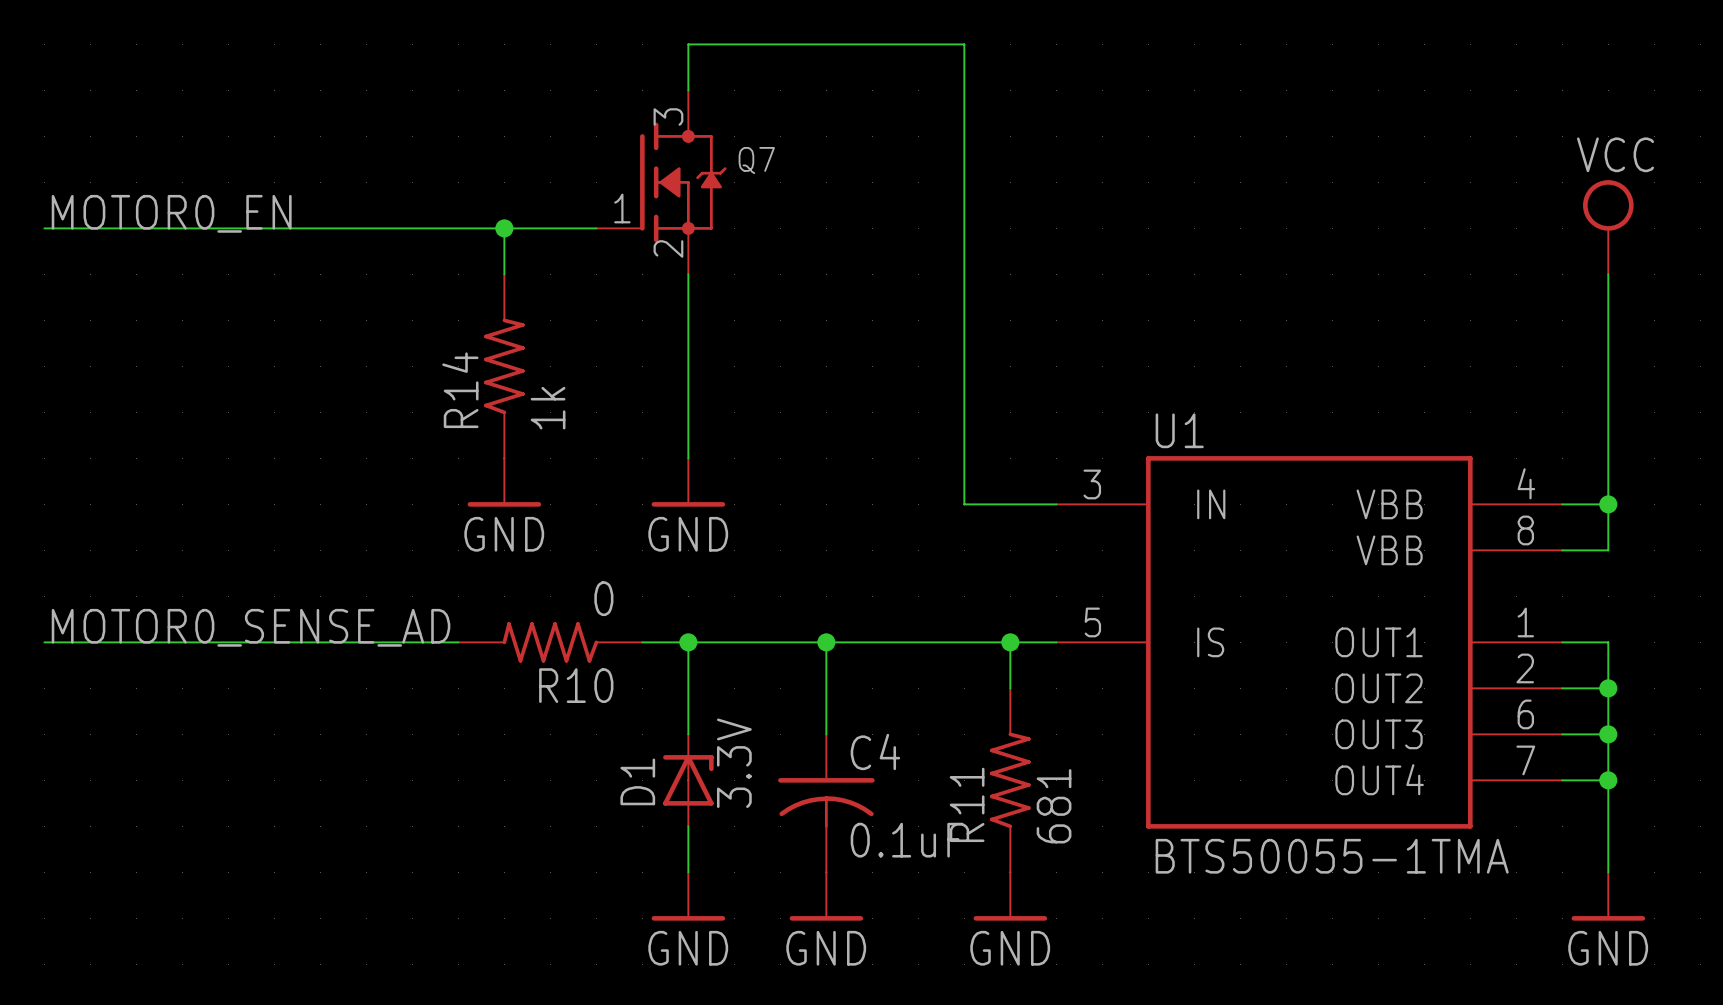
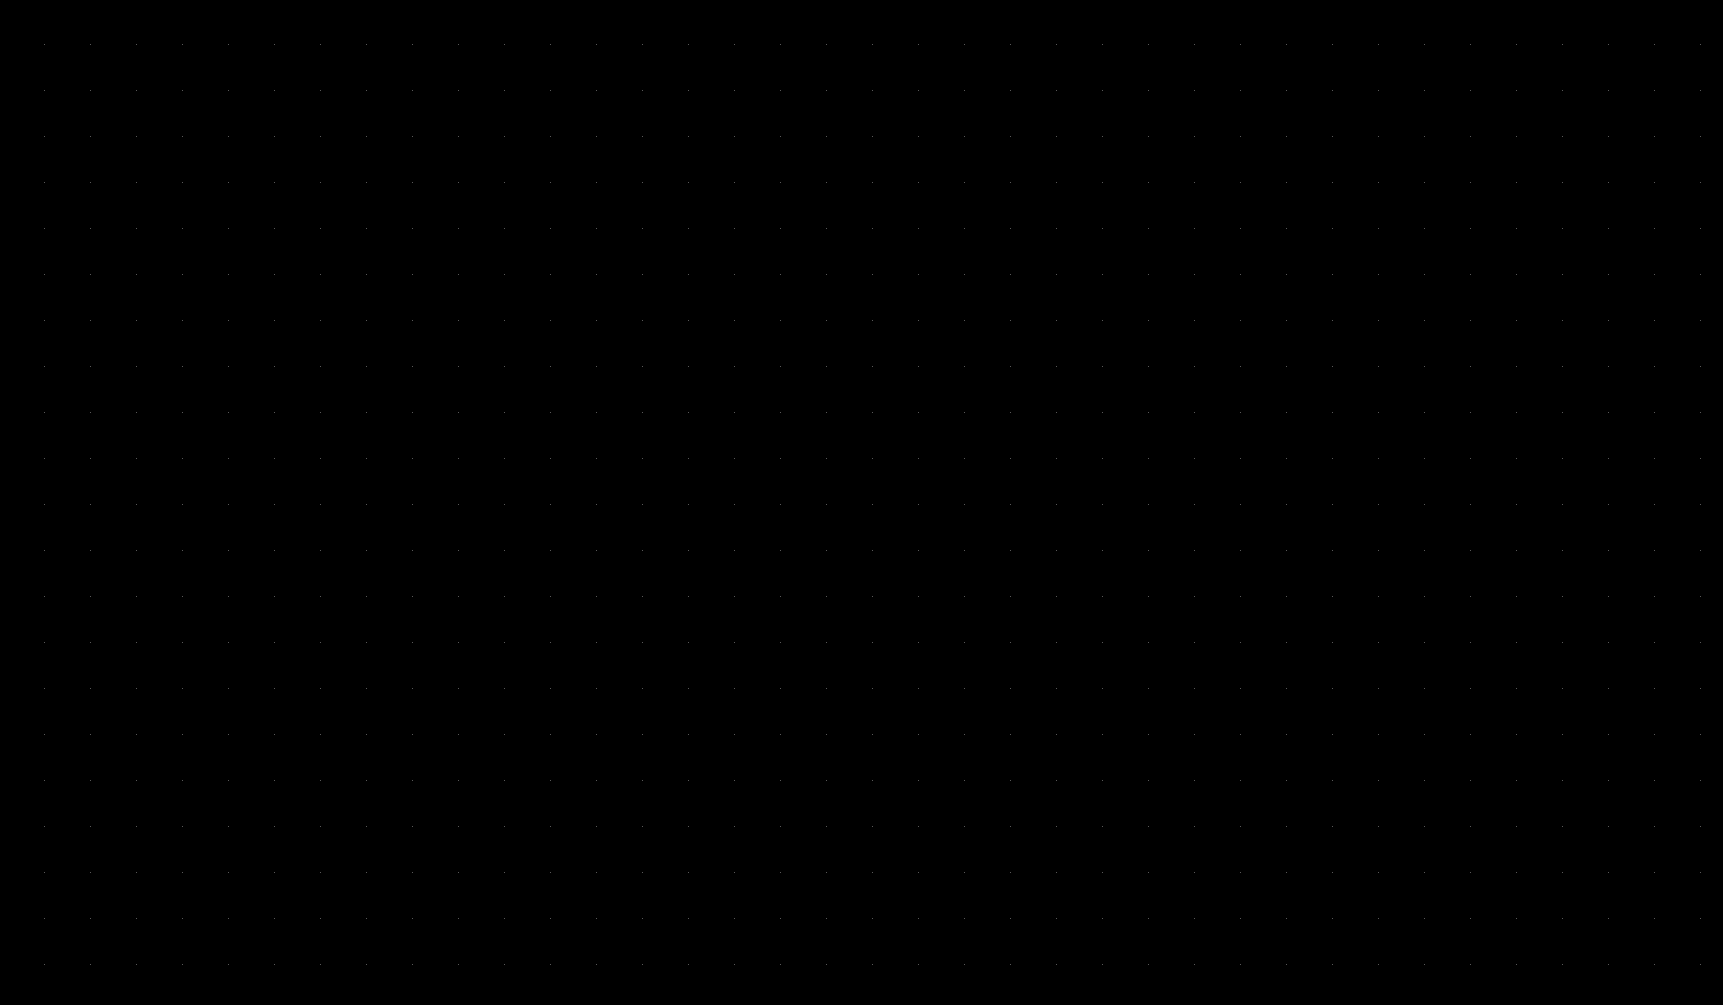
wire: (688, 90) (688, 44) (964, 44) (964, 504) (1056, 504) -> none
Q7: (661, 182) -> none
label: MOTOR0_EN (171, 213) -> none
power symbol: VCC (1608, 227) -> none
wire: (44, 228) (596, 228) -> none
wire: (504, 228) (504, 274) -> none
junction: (504, 228) -> none
wire: (688, 274) (688, 458) -> none
wire: (1608, 274) (1608, 550) (1562, 550) -> none
R14: 1k (504, 366) -> none
power symbol: GND (504, 482) -> none
power symbol: GND (688, 482) -> none
wire: (1562, 504) (1608, 504) -> none
junction: (1608, 504) -> none
label: MOTOR0_SENSE_AD (251, 627) -> none
wire: (44, 642) (458, 642) -> none
R10: 0 (550, 642) -> none
wire: (642, 642) (1056, 642) -> none
wire: (688, 642) (688, 734) -> none
junction: (688, 642) -> none
wire: (826, 642) (826, 734) -> none
junction: (826, 642) -> none
wire: (1010, 642) (1010, 688) -> none
junction: (1010, 642) -> none
U1: BTS50055-1TMA (1309, 642) -> none
wire: (1562, 642) (1608, 642) (1608, 872) -> none
wire: (1562, 688) (1608, 688) -> none
junction: (1608, 688) -> none
wire: (1562, 734) (1608, 734) -> none
junction: (1608, 734) -> none
D1: 3.3V (688, 780) -> none
R11: 681 (1010, 780) -> none
wire: (1562, 780) (1608, 780) -> none
junction: (1608, 780) -> none
C4: 0.1uF (826, 803) -> none
wire: (688, 826) (688, 872) -> none
power symbol: GND (688, 896) -> none
power symbol: GND (826, 896) -> none
power symbol: GND (1010, 896) -> none
power symbol: GND (1608, 896) -> none

